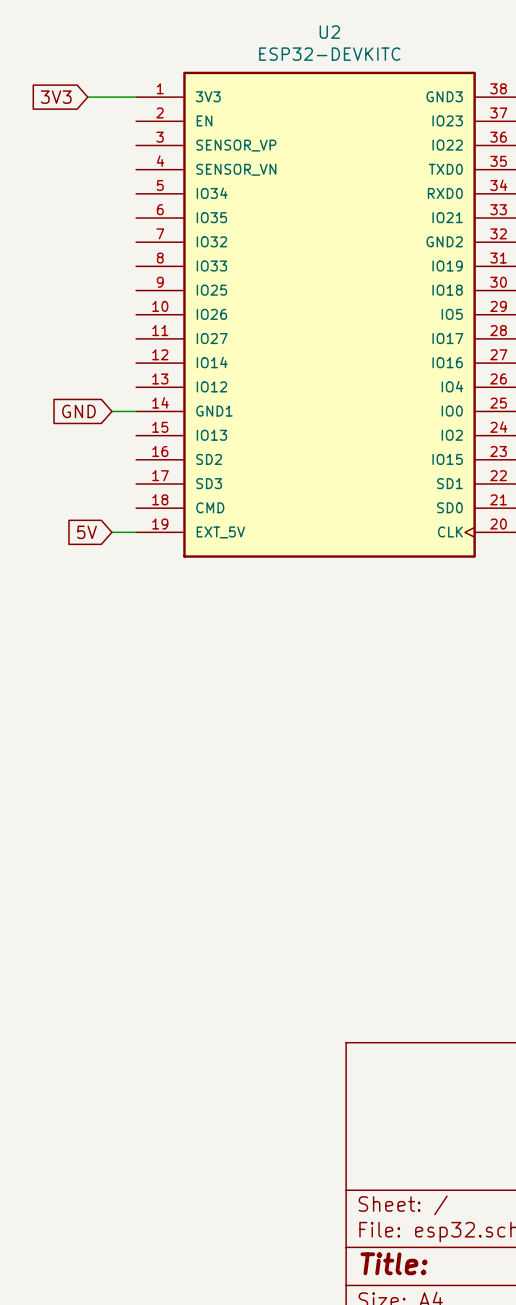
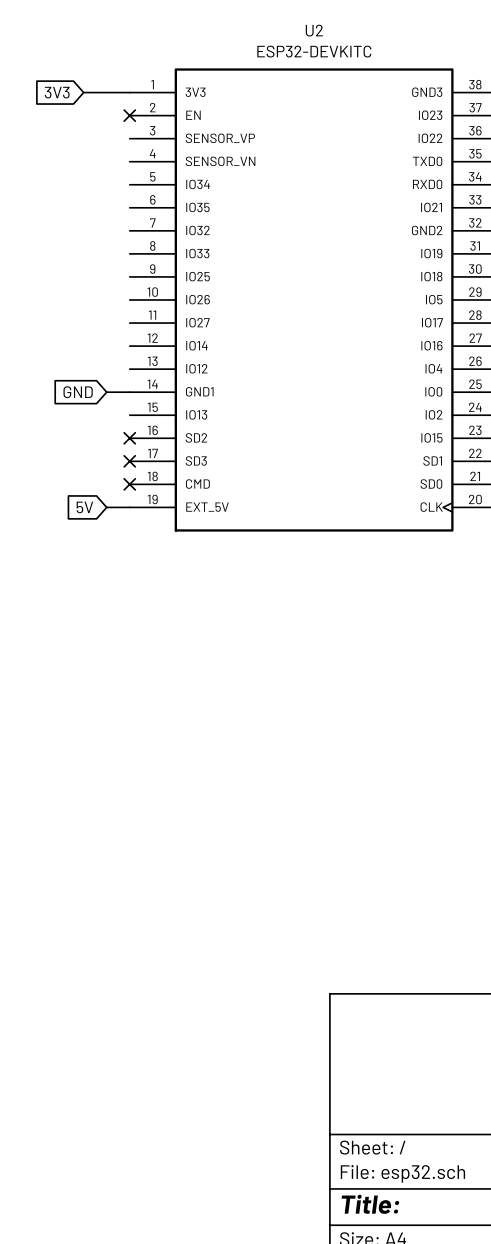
no-connect mark: none -> (129, 115)
no-connect mark: none -> (129, 438)
no-connect mark: none -> (129, 461)
no-connect mark: none -> (129, 484)

